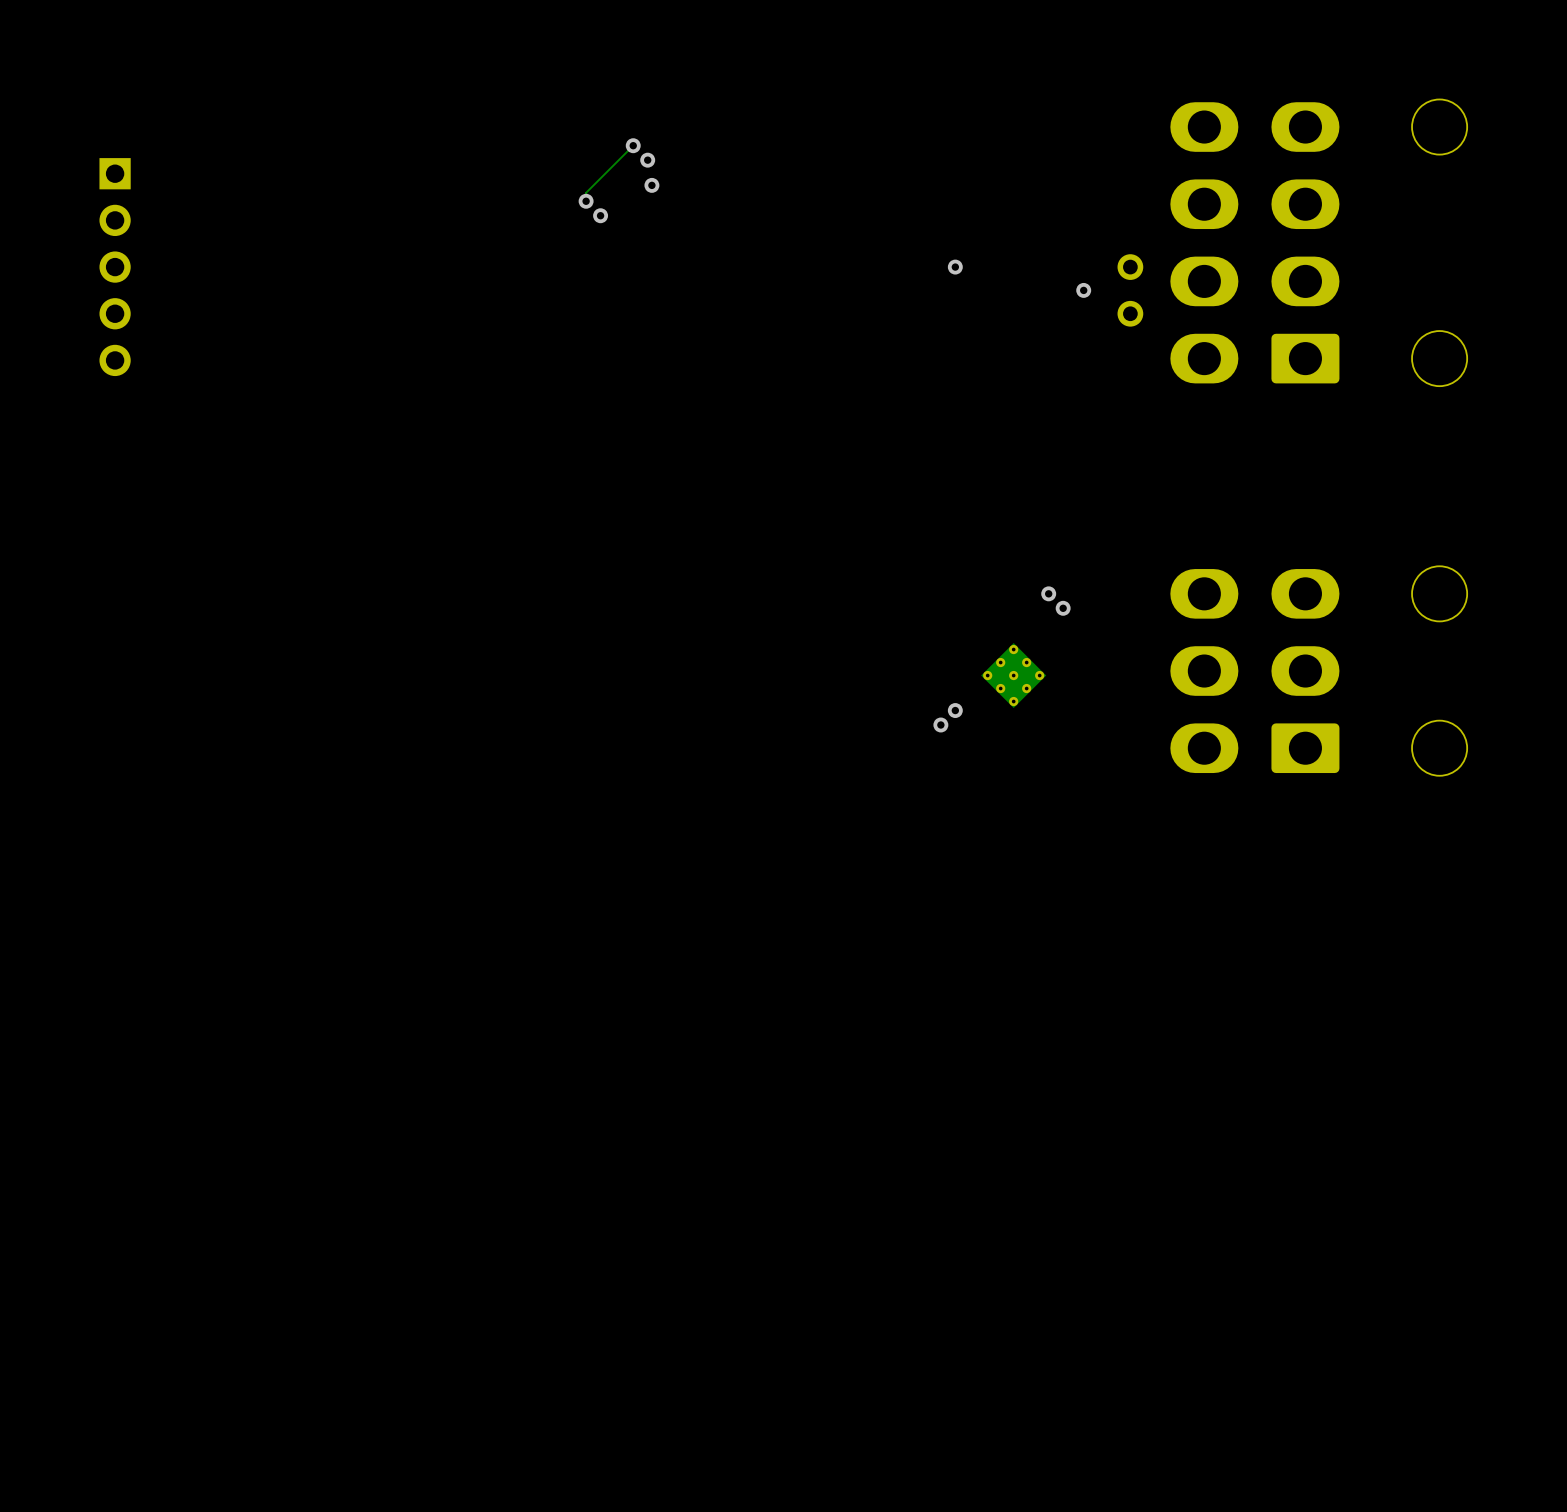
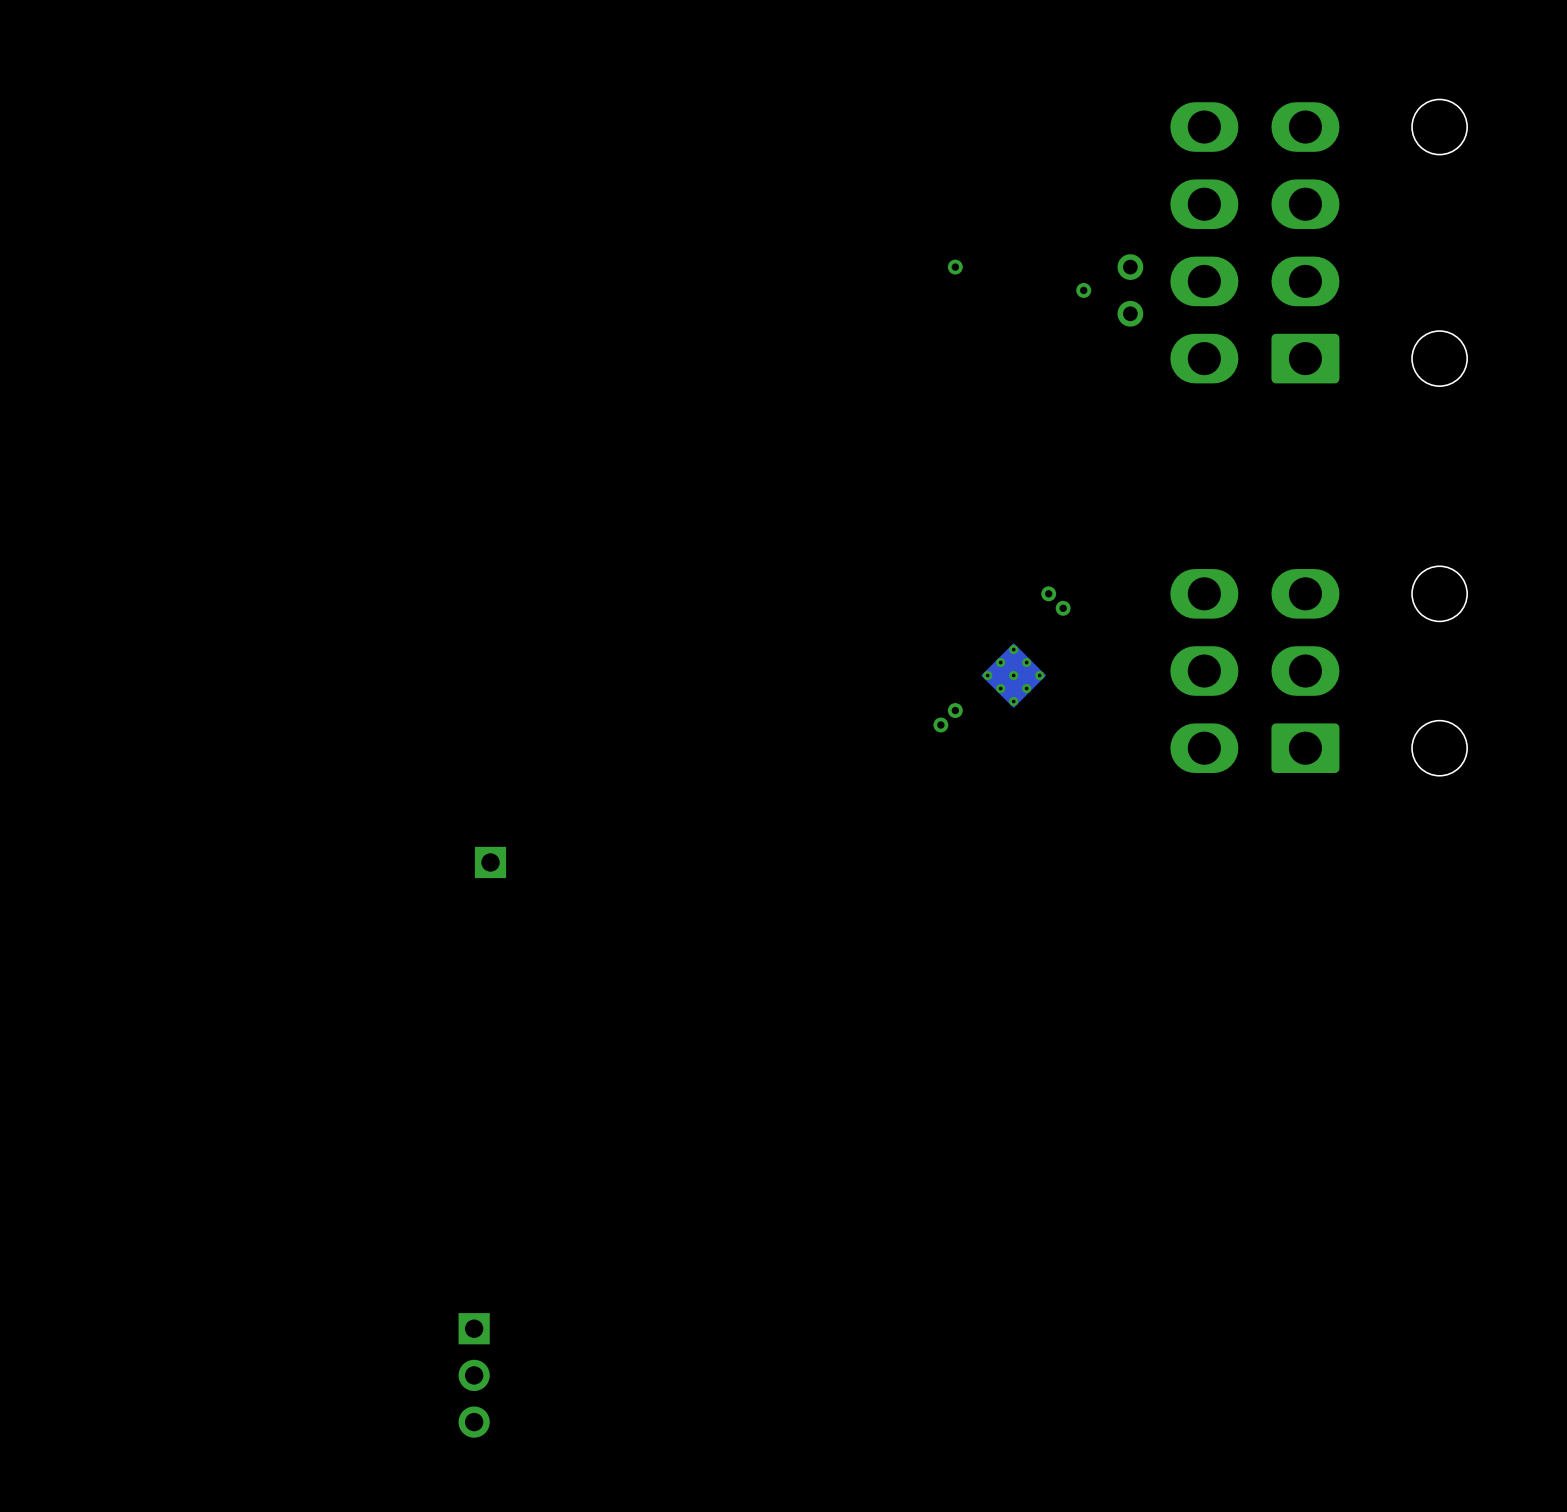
track: (633, 145) (586, 192) (586, 201) -> none
via: (633, 145) -> none
via: (647, 160) -> none
via: (651, 185) -> none
via: (586, 201) -> none
via: (600, 215) -> none
part: (115, 267) -> none
part: none -> (490, 862)
part: none -> (474, 1375)

